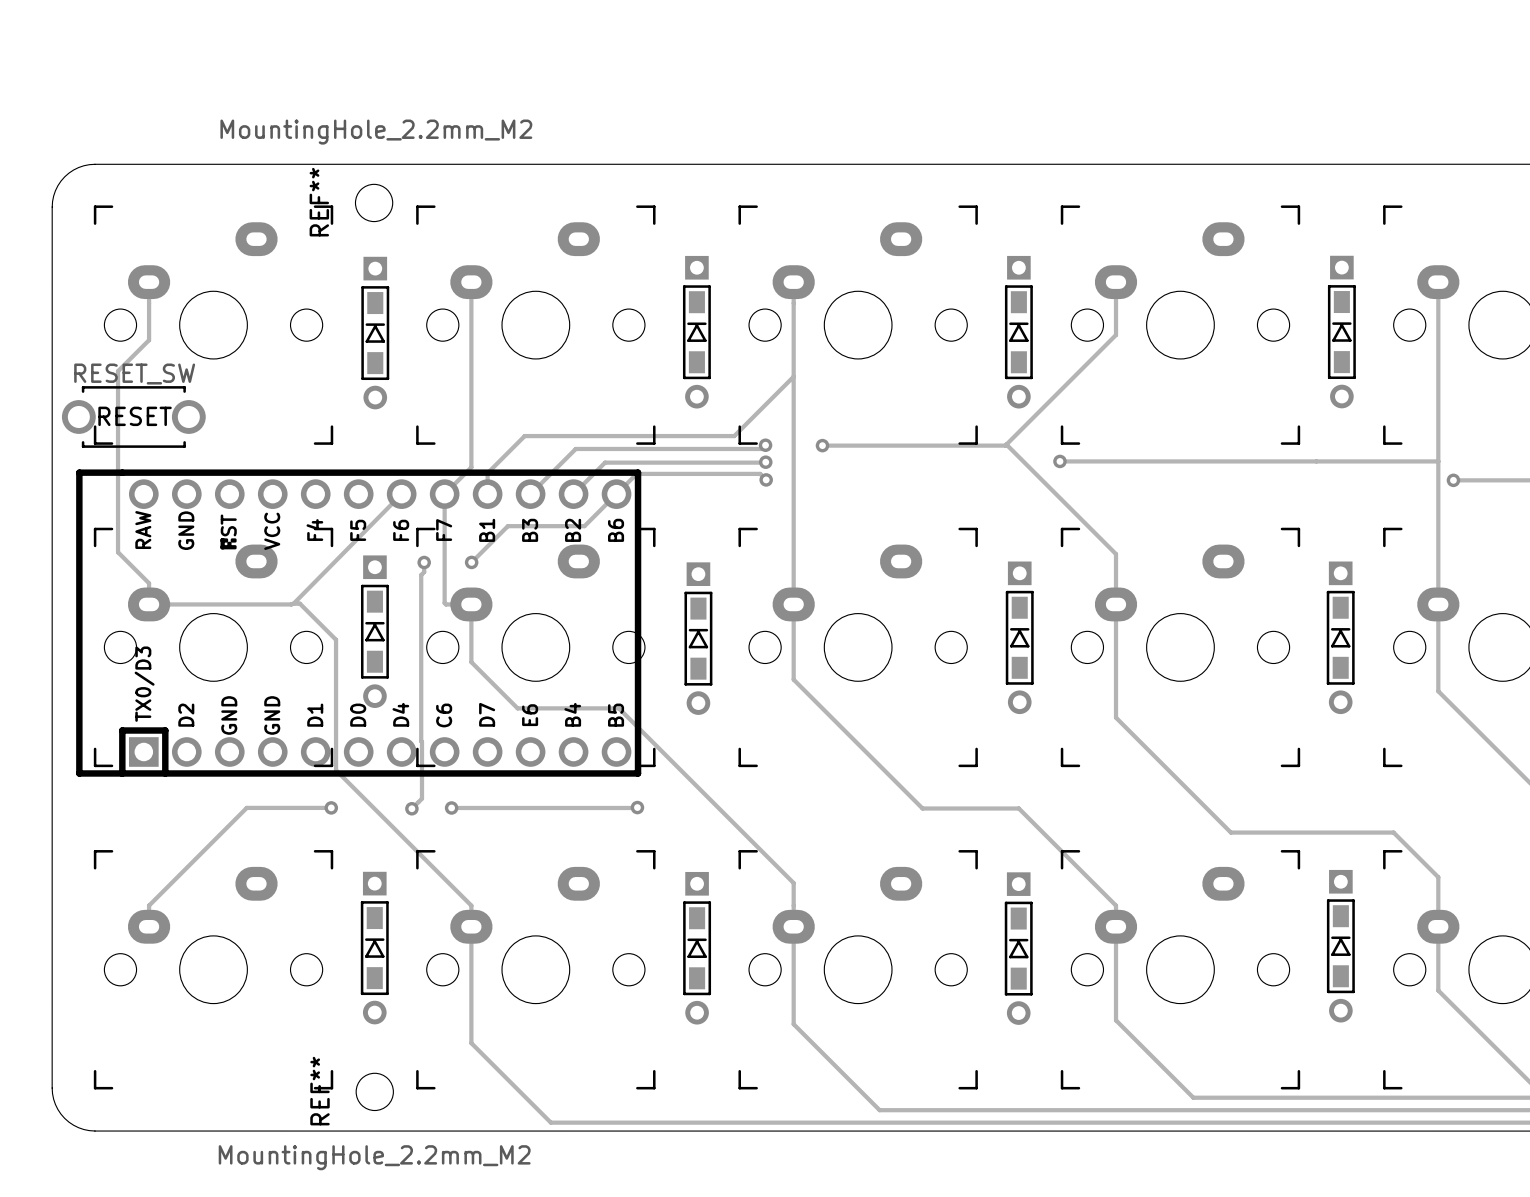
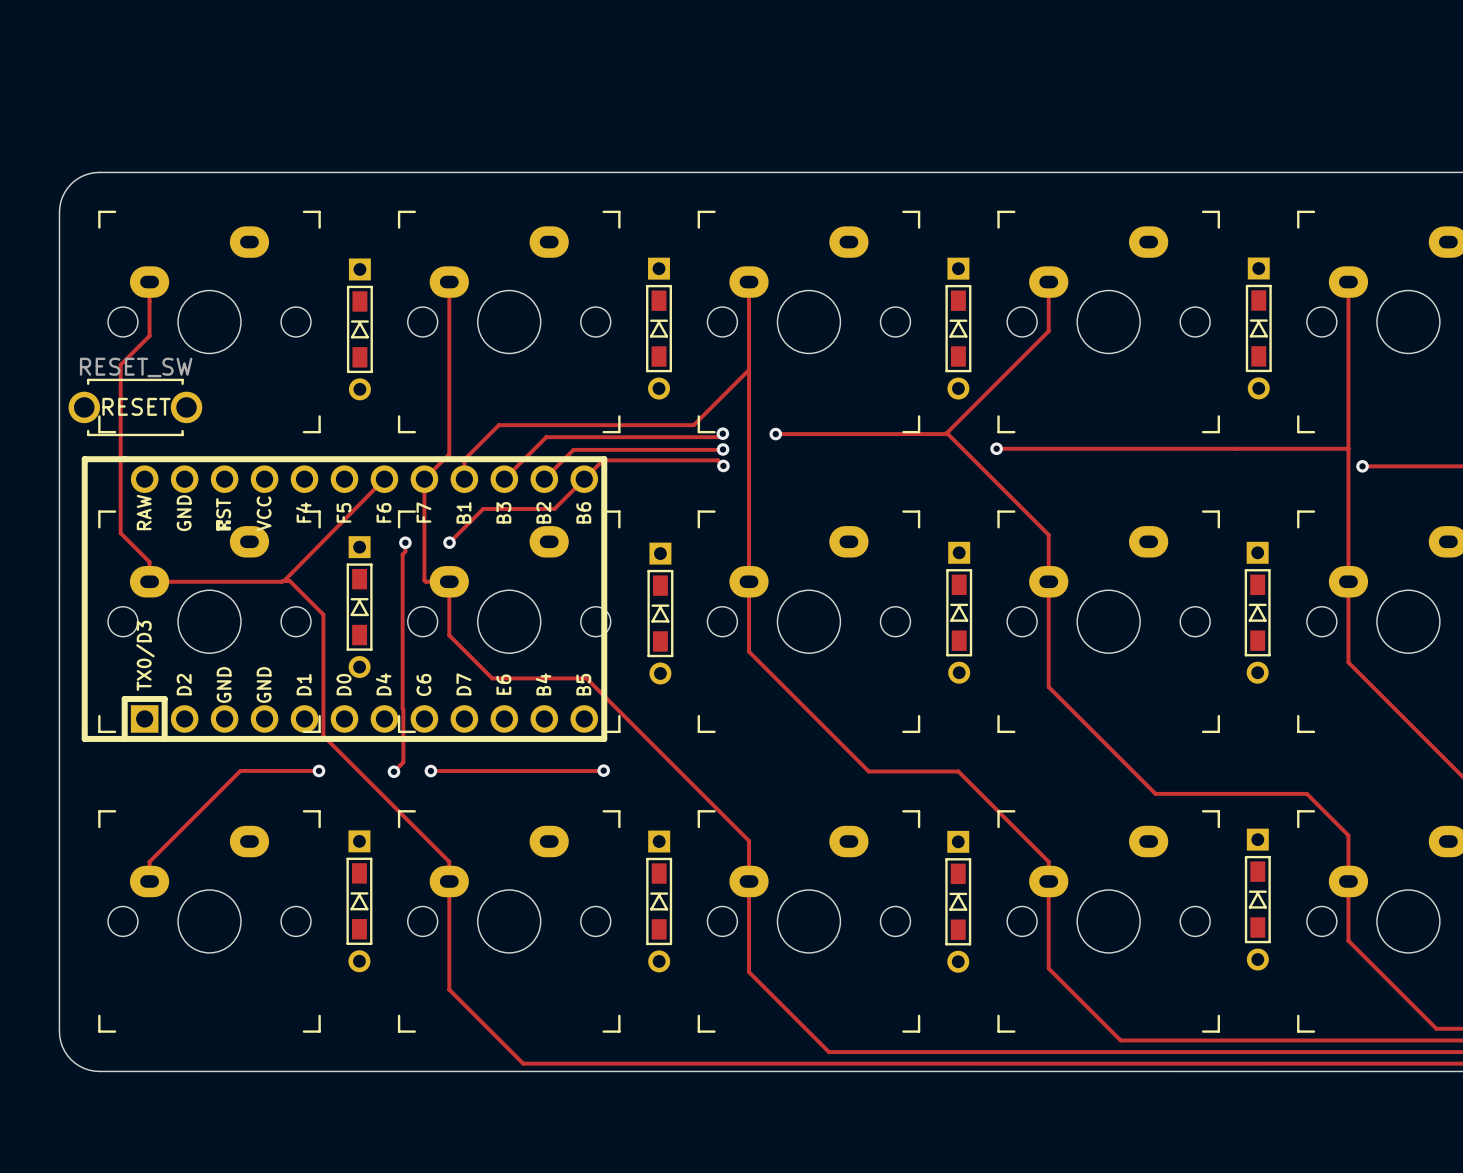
REF**: MountingHole_2.2mm_M2 (374, 202) -> none
REF**: MountingHole_2.2mm_M2 (374, 1091) -> none

